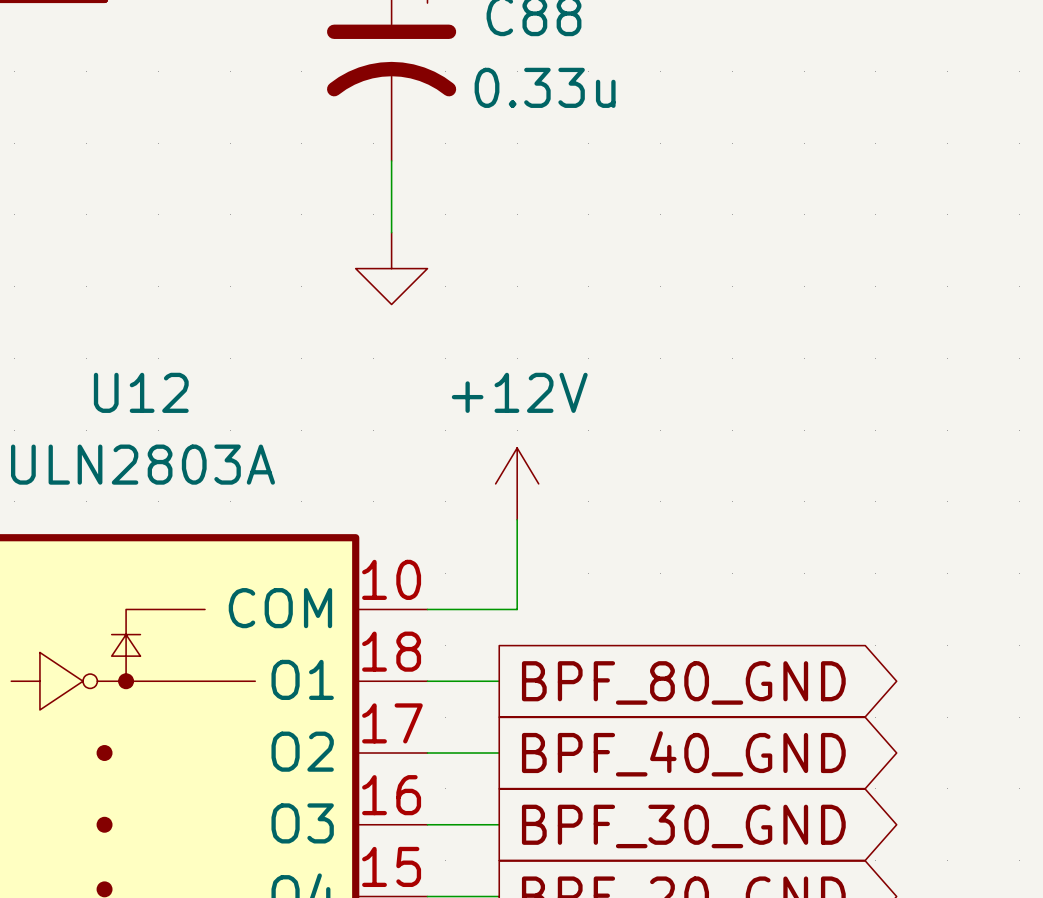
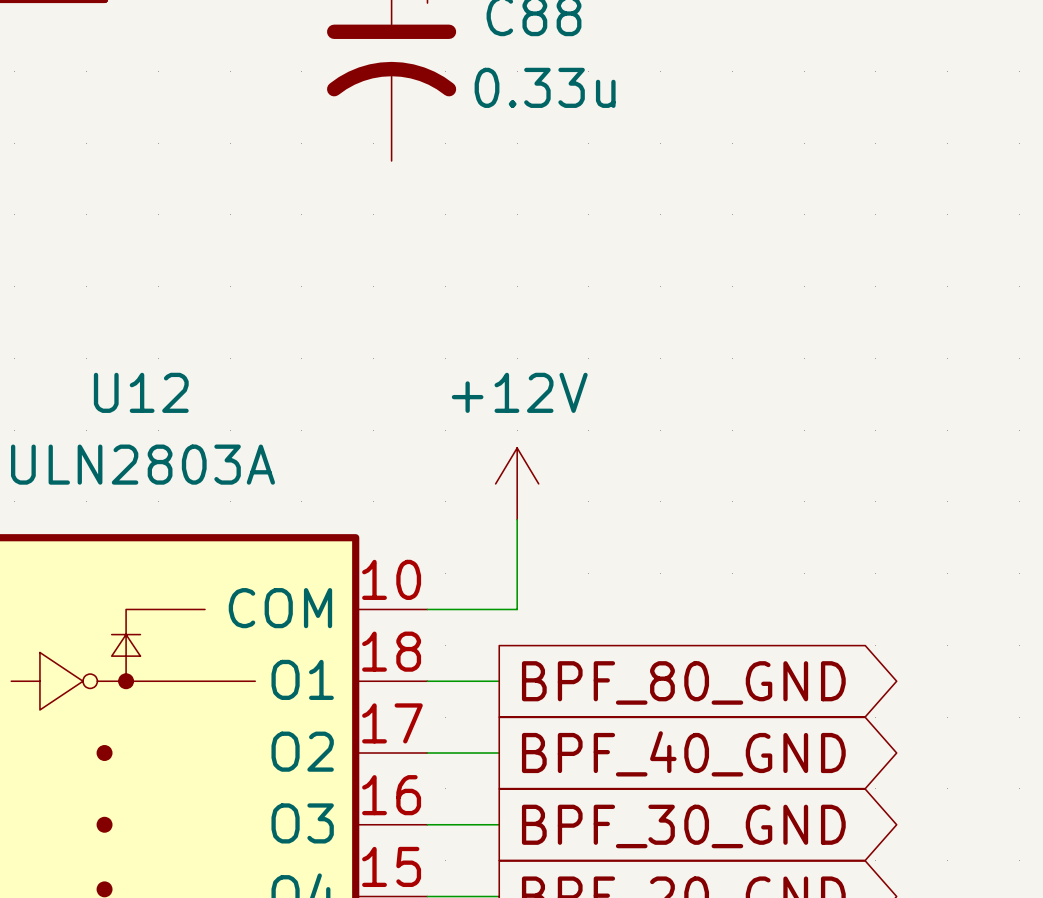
wire: (391, 160) (391, 232) -> none
power symbol: (391, 268) -> none

